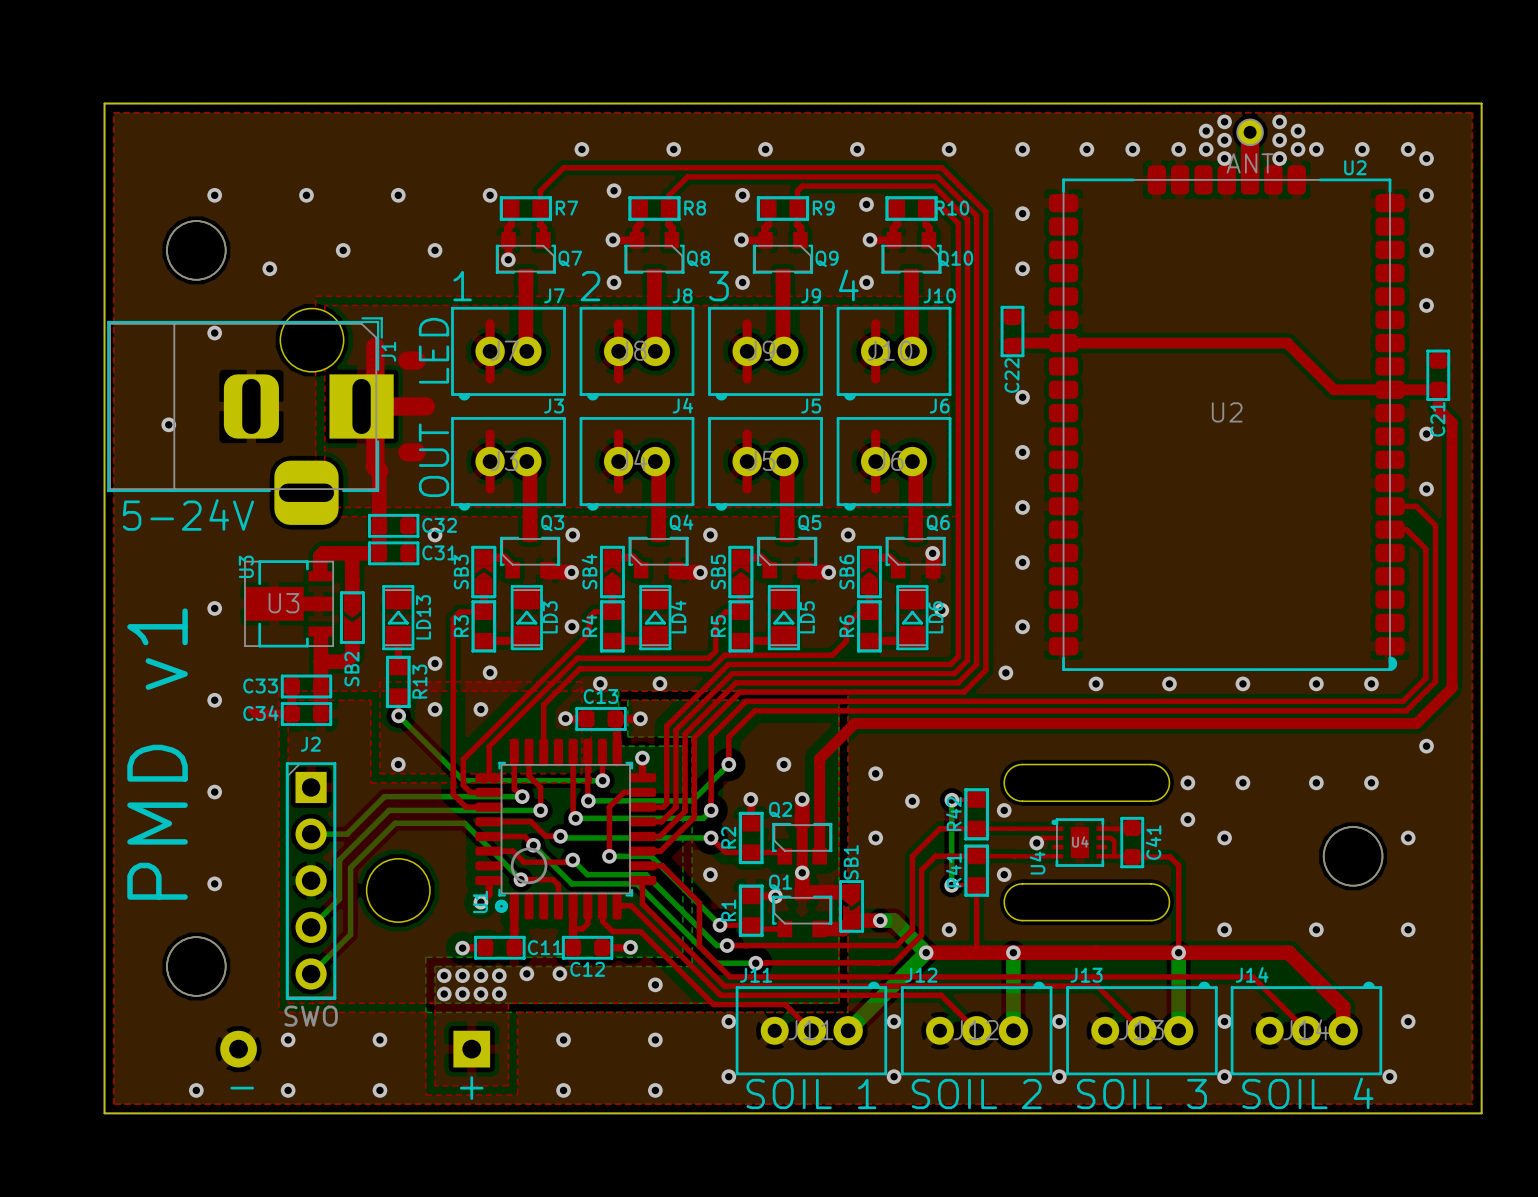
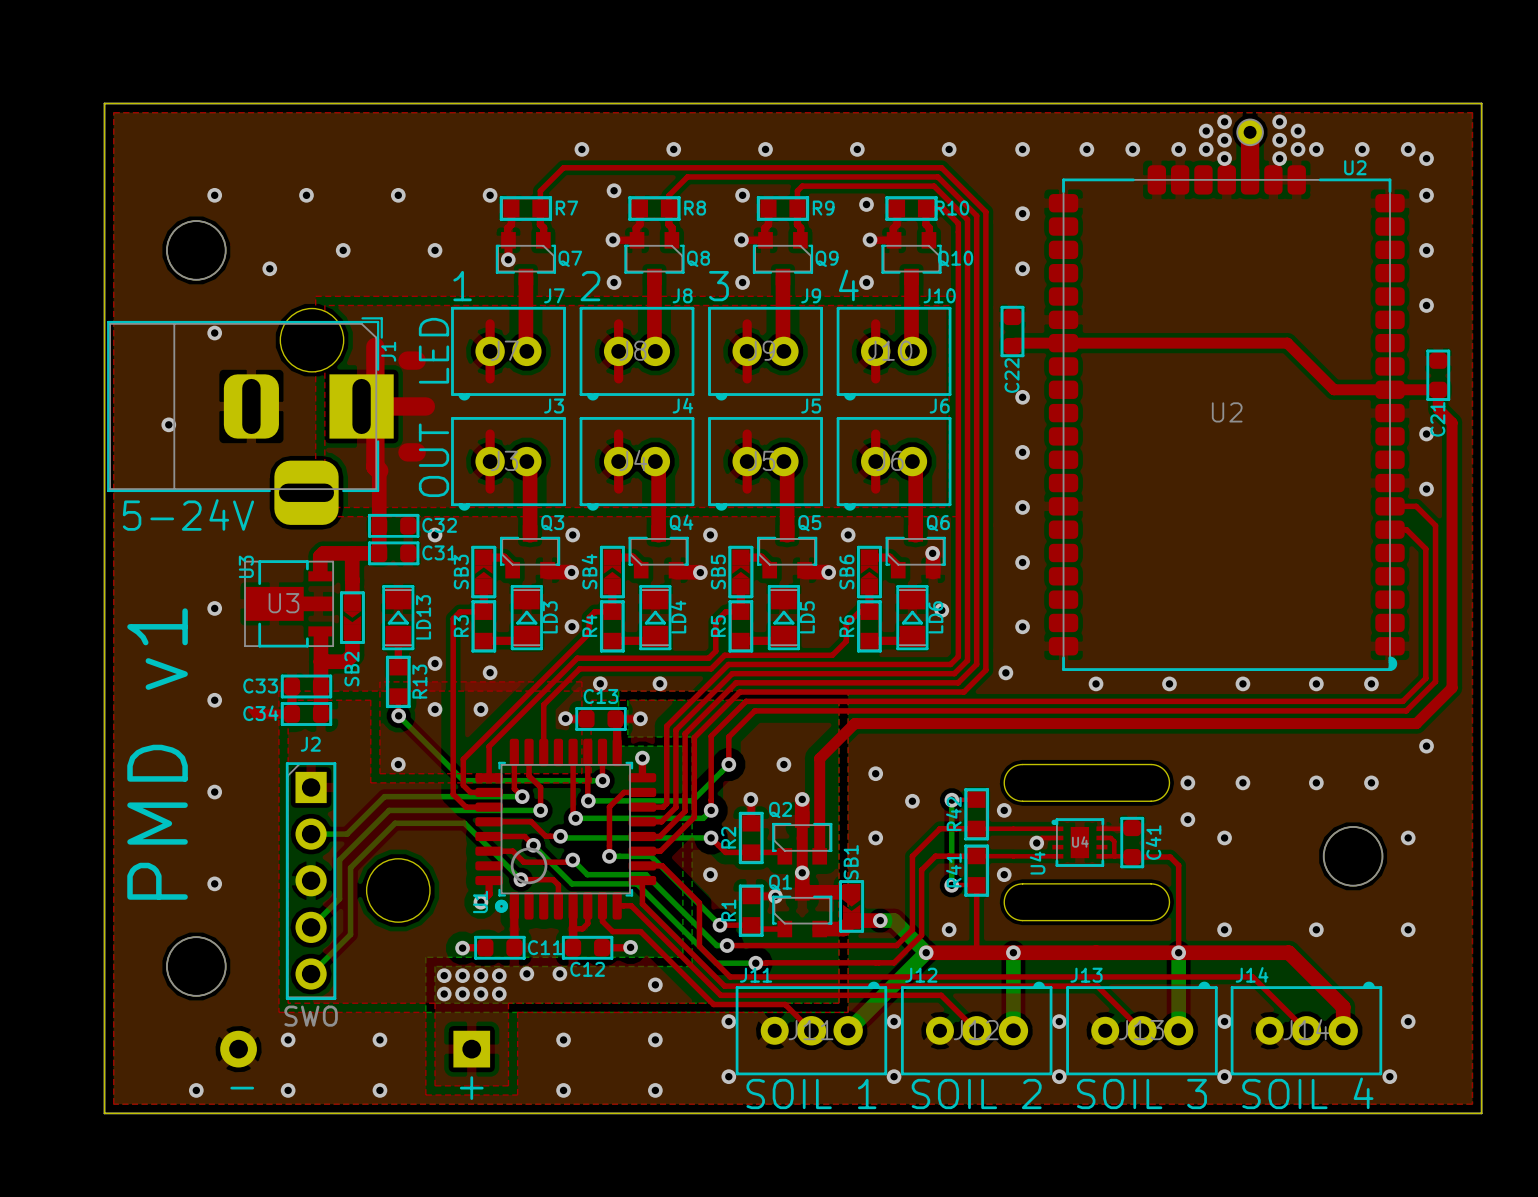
text: ANT (1250, 163) -> none

